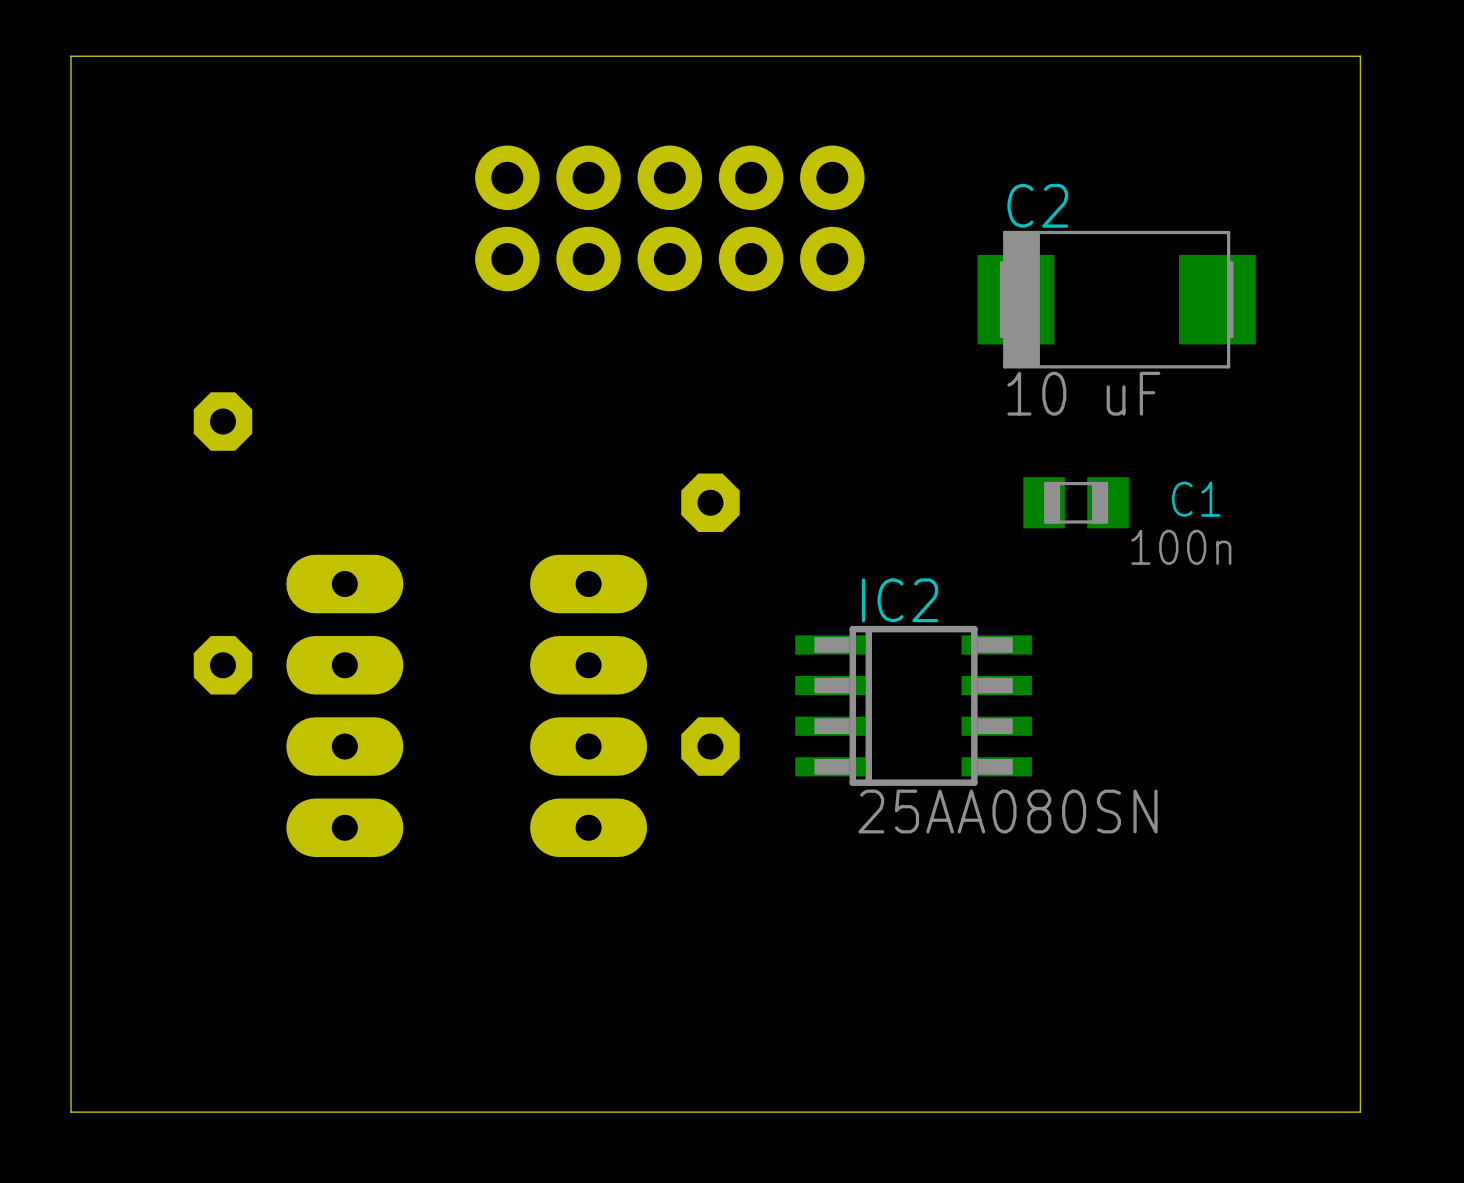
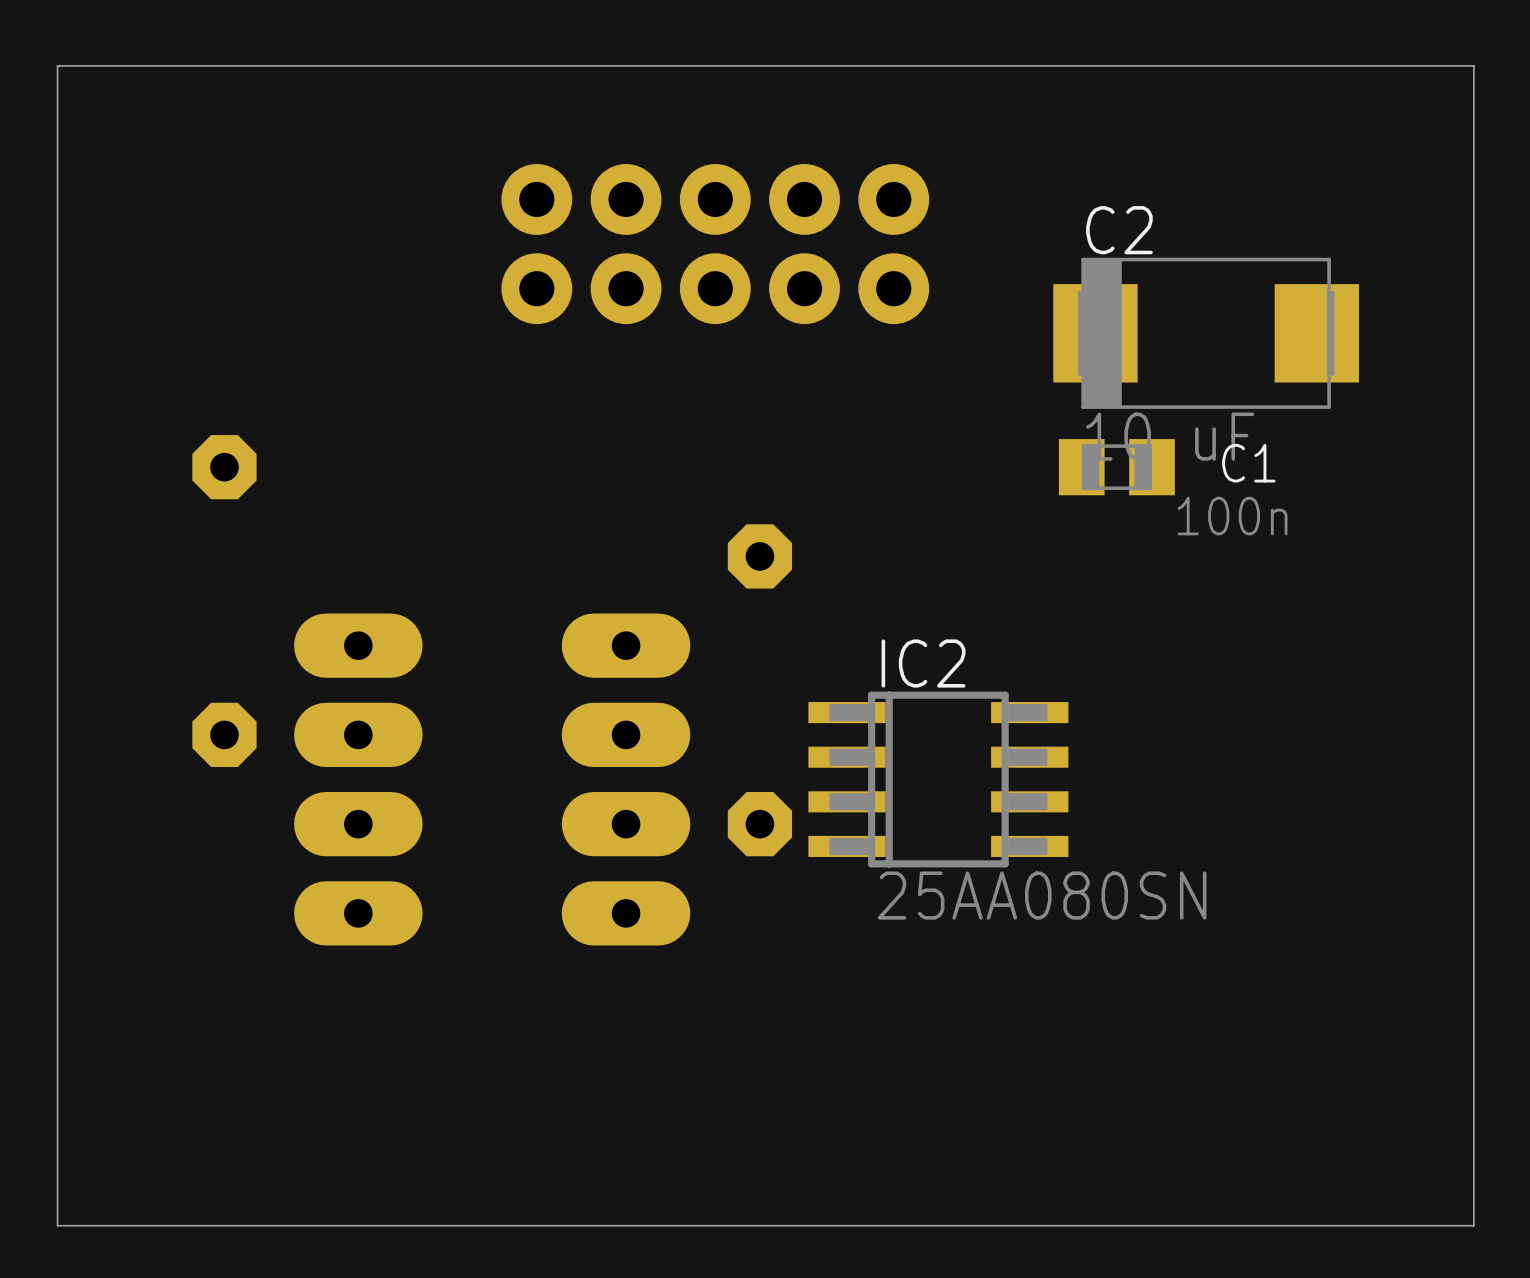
C1 position: (1076, 502) -> (1116, 467)
IC2 position: (913, 705) -> (938, 779)

